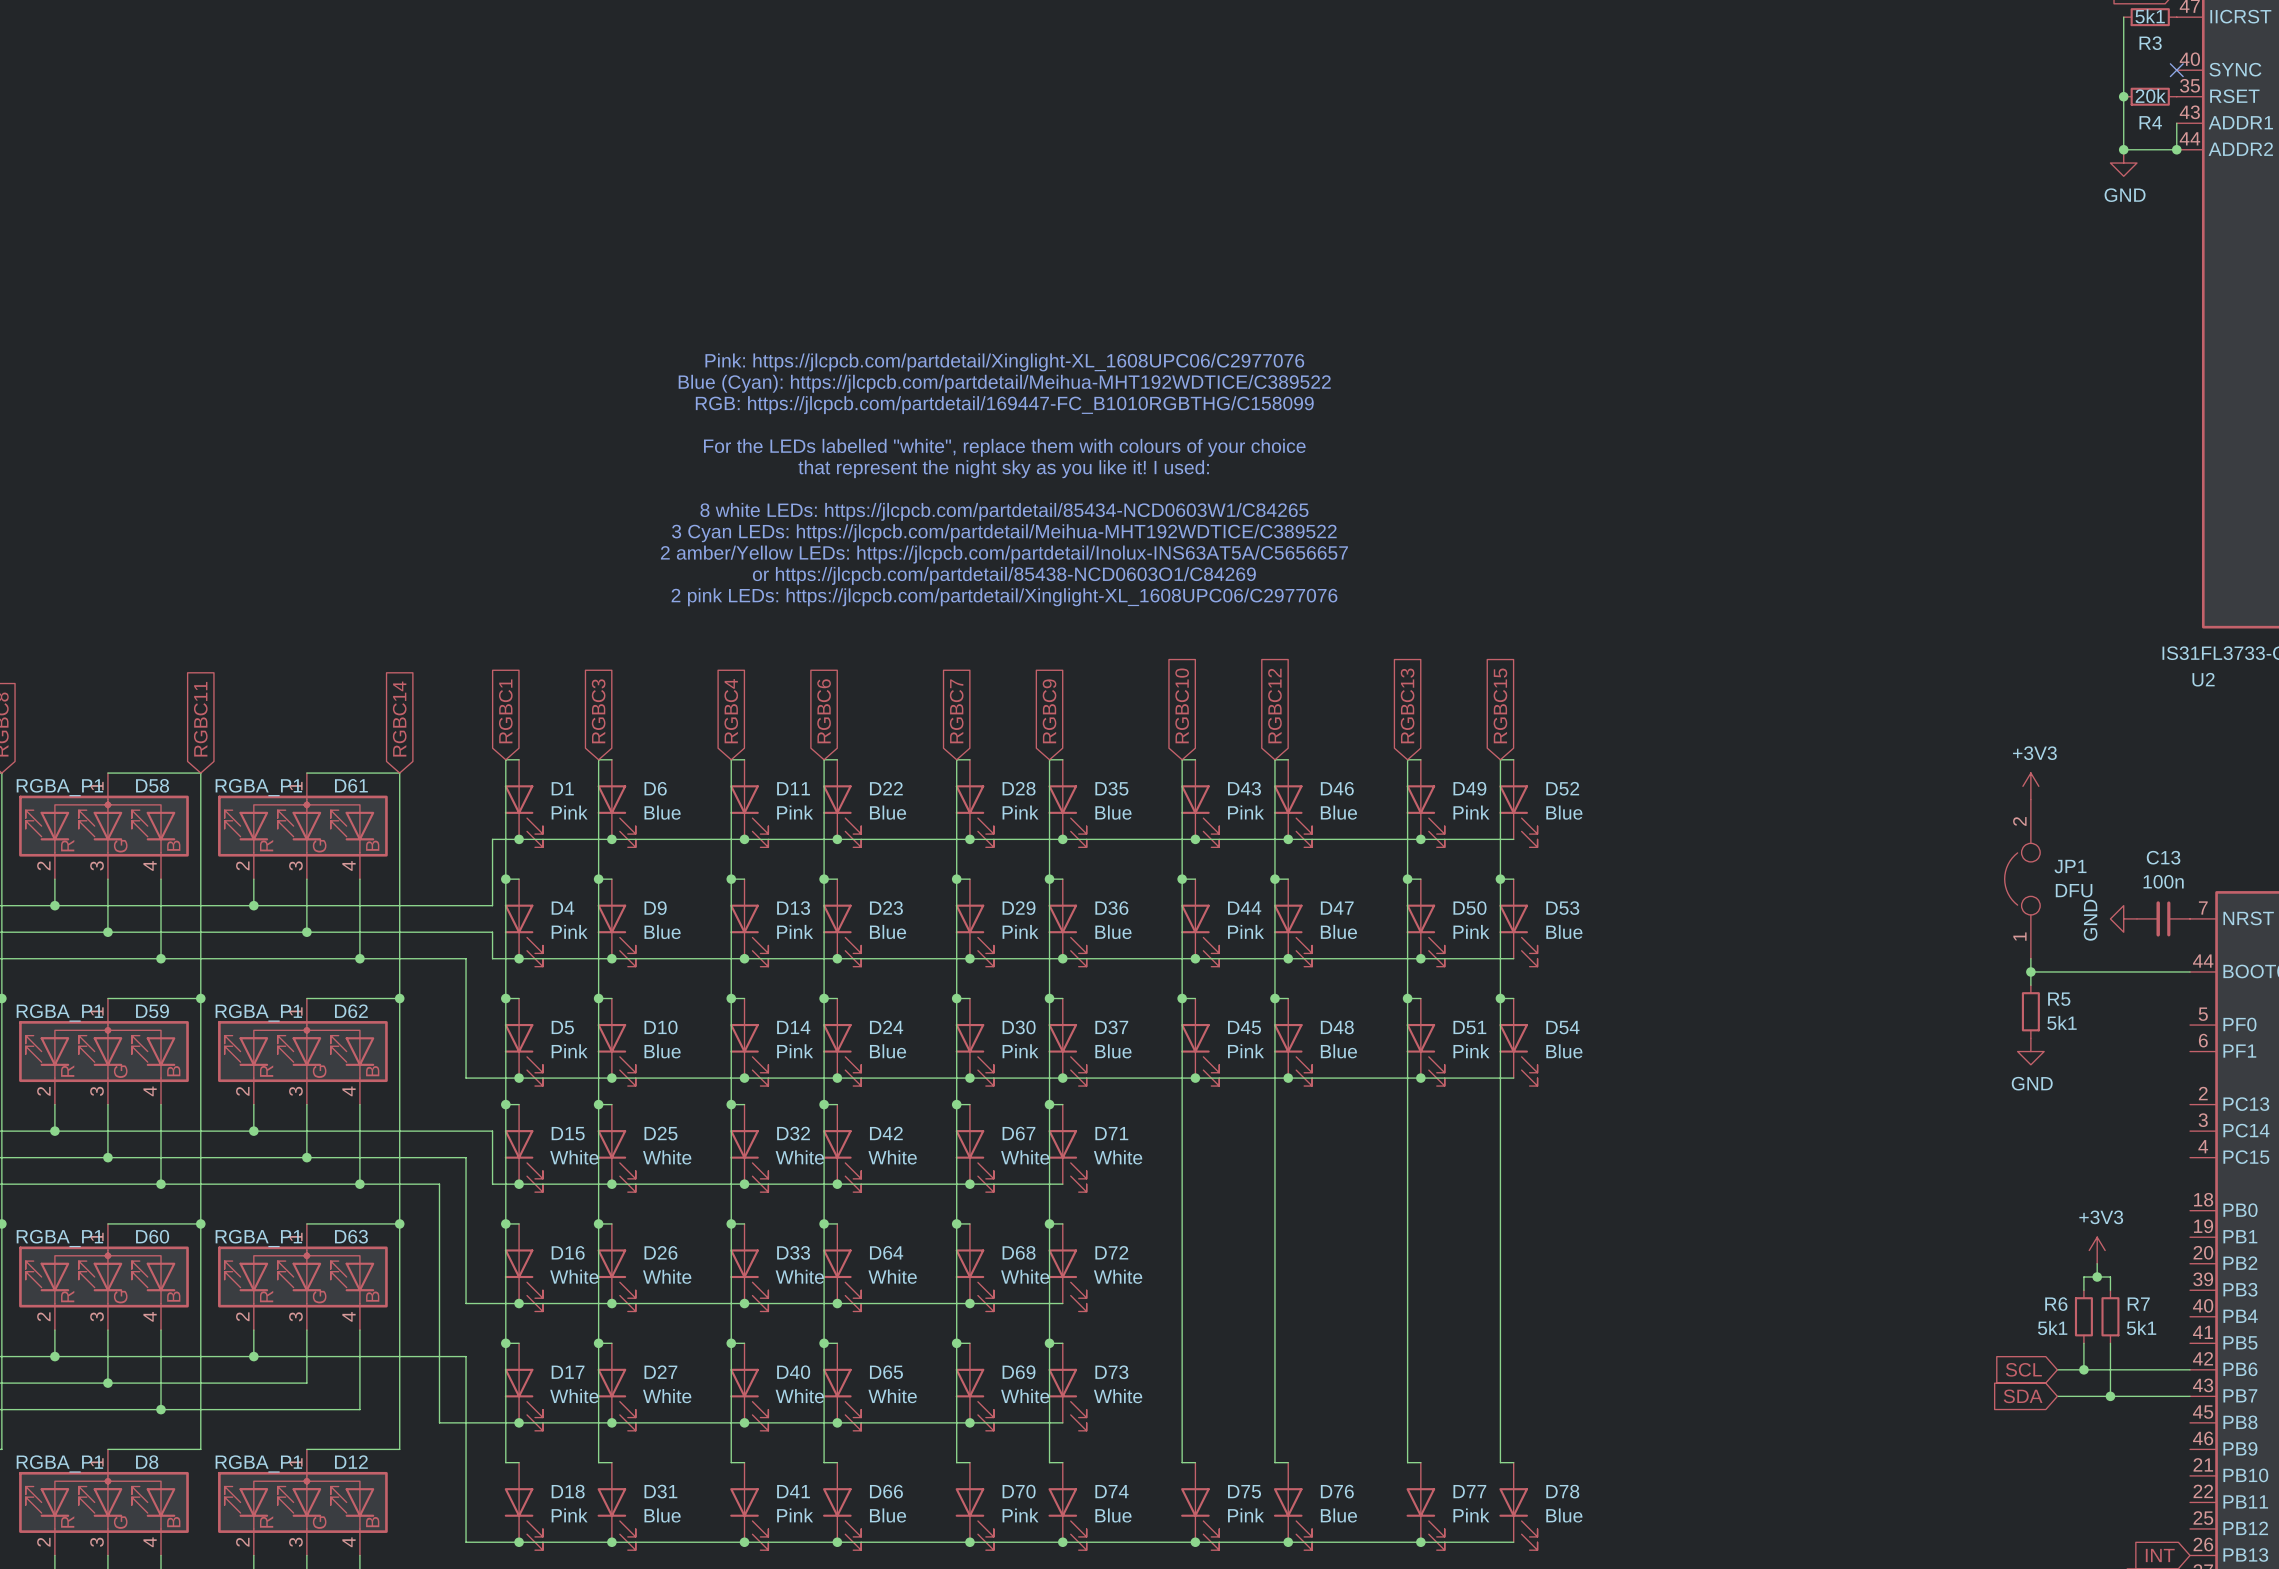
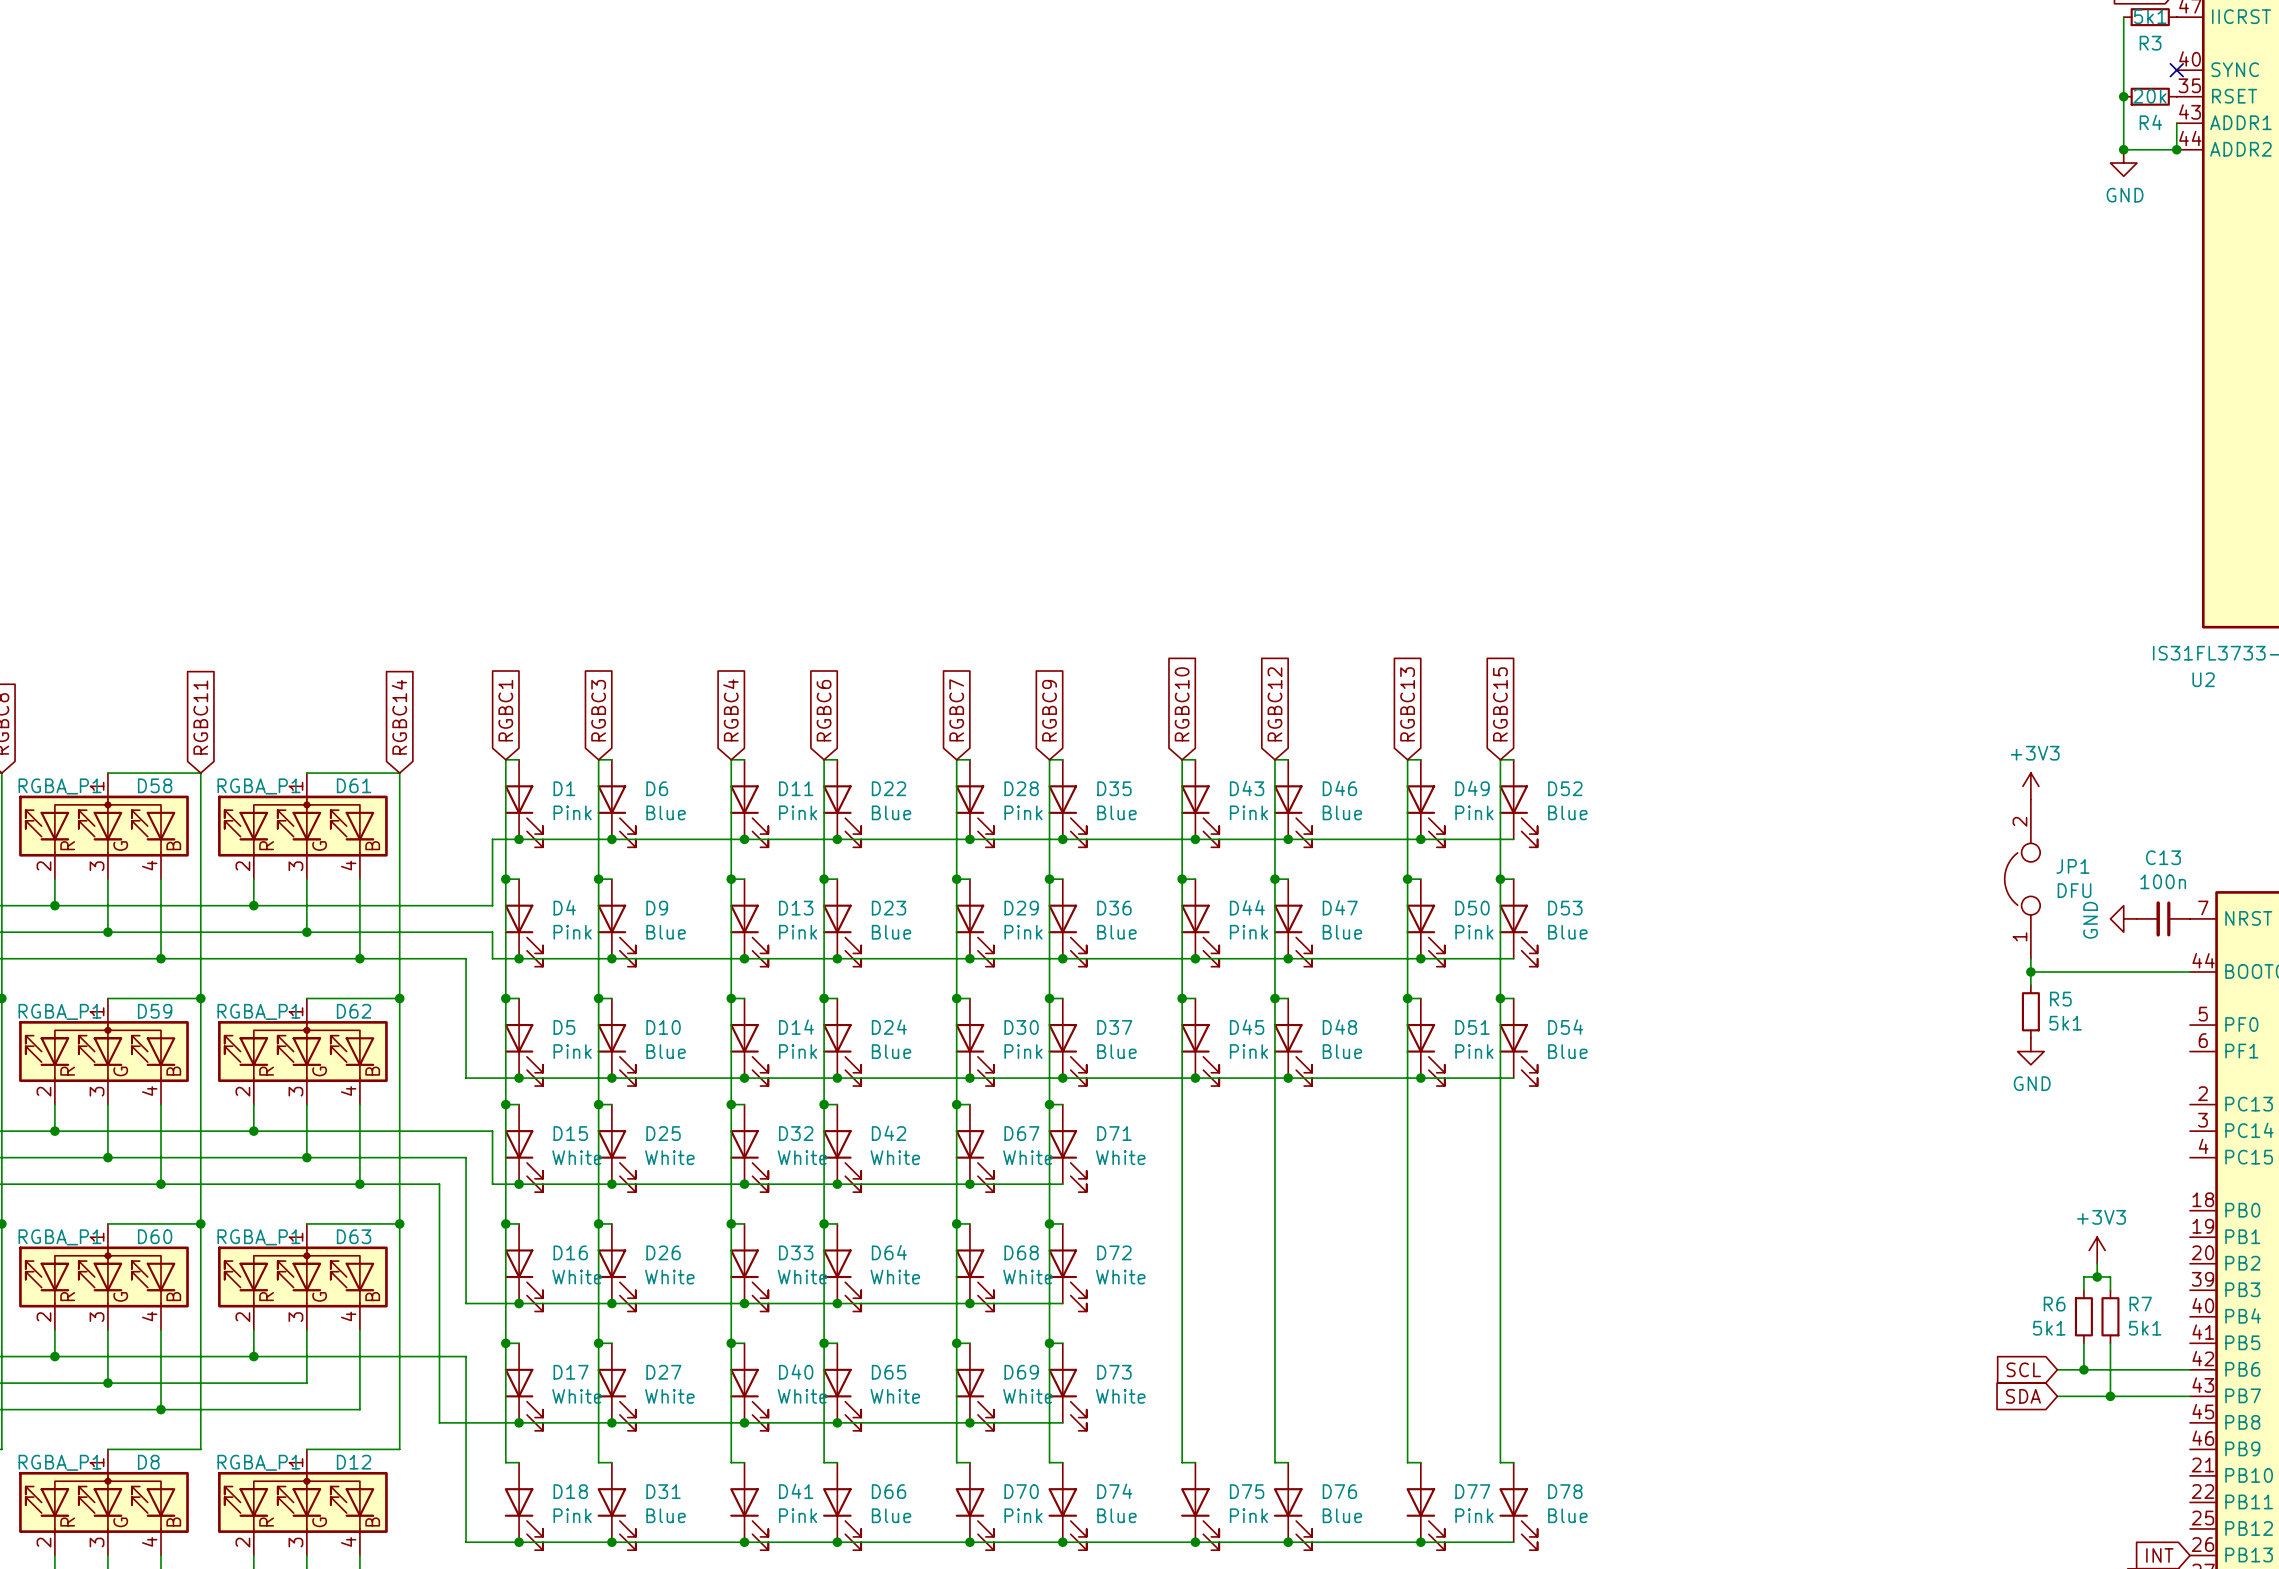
text: Pink: https://jlcpcb.com/partdetail/Xinglight-XL_1608UPC06/C2977076 (1004, 362) -> none
text: Blue (Cyan): https://jlcpcb.com/partdetail/Meihua-MHT192WDTICE/C389522 (1004, 383) -> none
text: RGB: https://jlcpcb.com/partdetail/169447-FC_B1010RGBTHG/C158099 (1004, 405) -> none
text: For the LEDs labelled "white", replace them with colours of your choice (1004, 447) -> none
text: that represent the night sky as you like it! I used: (1003, 469) -> none
text: 8 white LEDs: https://jlcpcb.com/partdetail/85434-NCD0603W1/C84265 (1004, 511) -> none
text: 3 Cyan LEDs: https://jlcpcb.com/partdetail/Meihua-MHT192WDTICE/C389522 (1004, 533) -> none
text: 2 amber/Yellow LEDs: https://jlcpcb.com/partdetail/Inolux-INS63AT5A/C5656657 (1004, 554) -> none
text: or https://jlcpcb.com/partdetail/85438-NCD0603O1/C84269 (1004, 575) -> none
text: 2 pink LEDs: https://jlcpcb.com/partdetail/Xinglight-XL_1608UPC06/C2977076 (1004, 597) -> none

